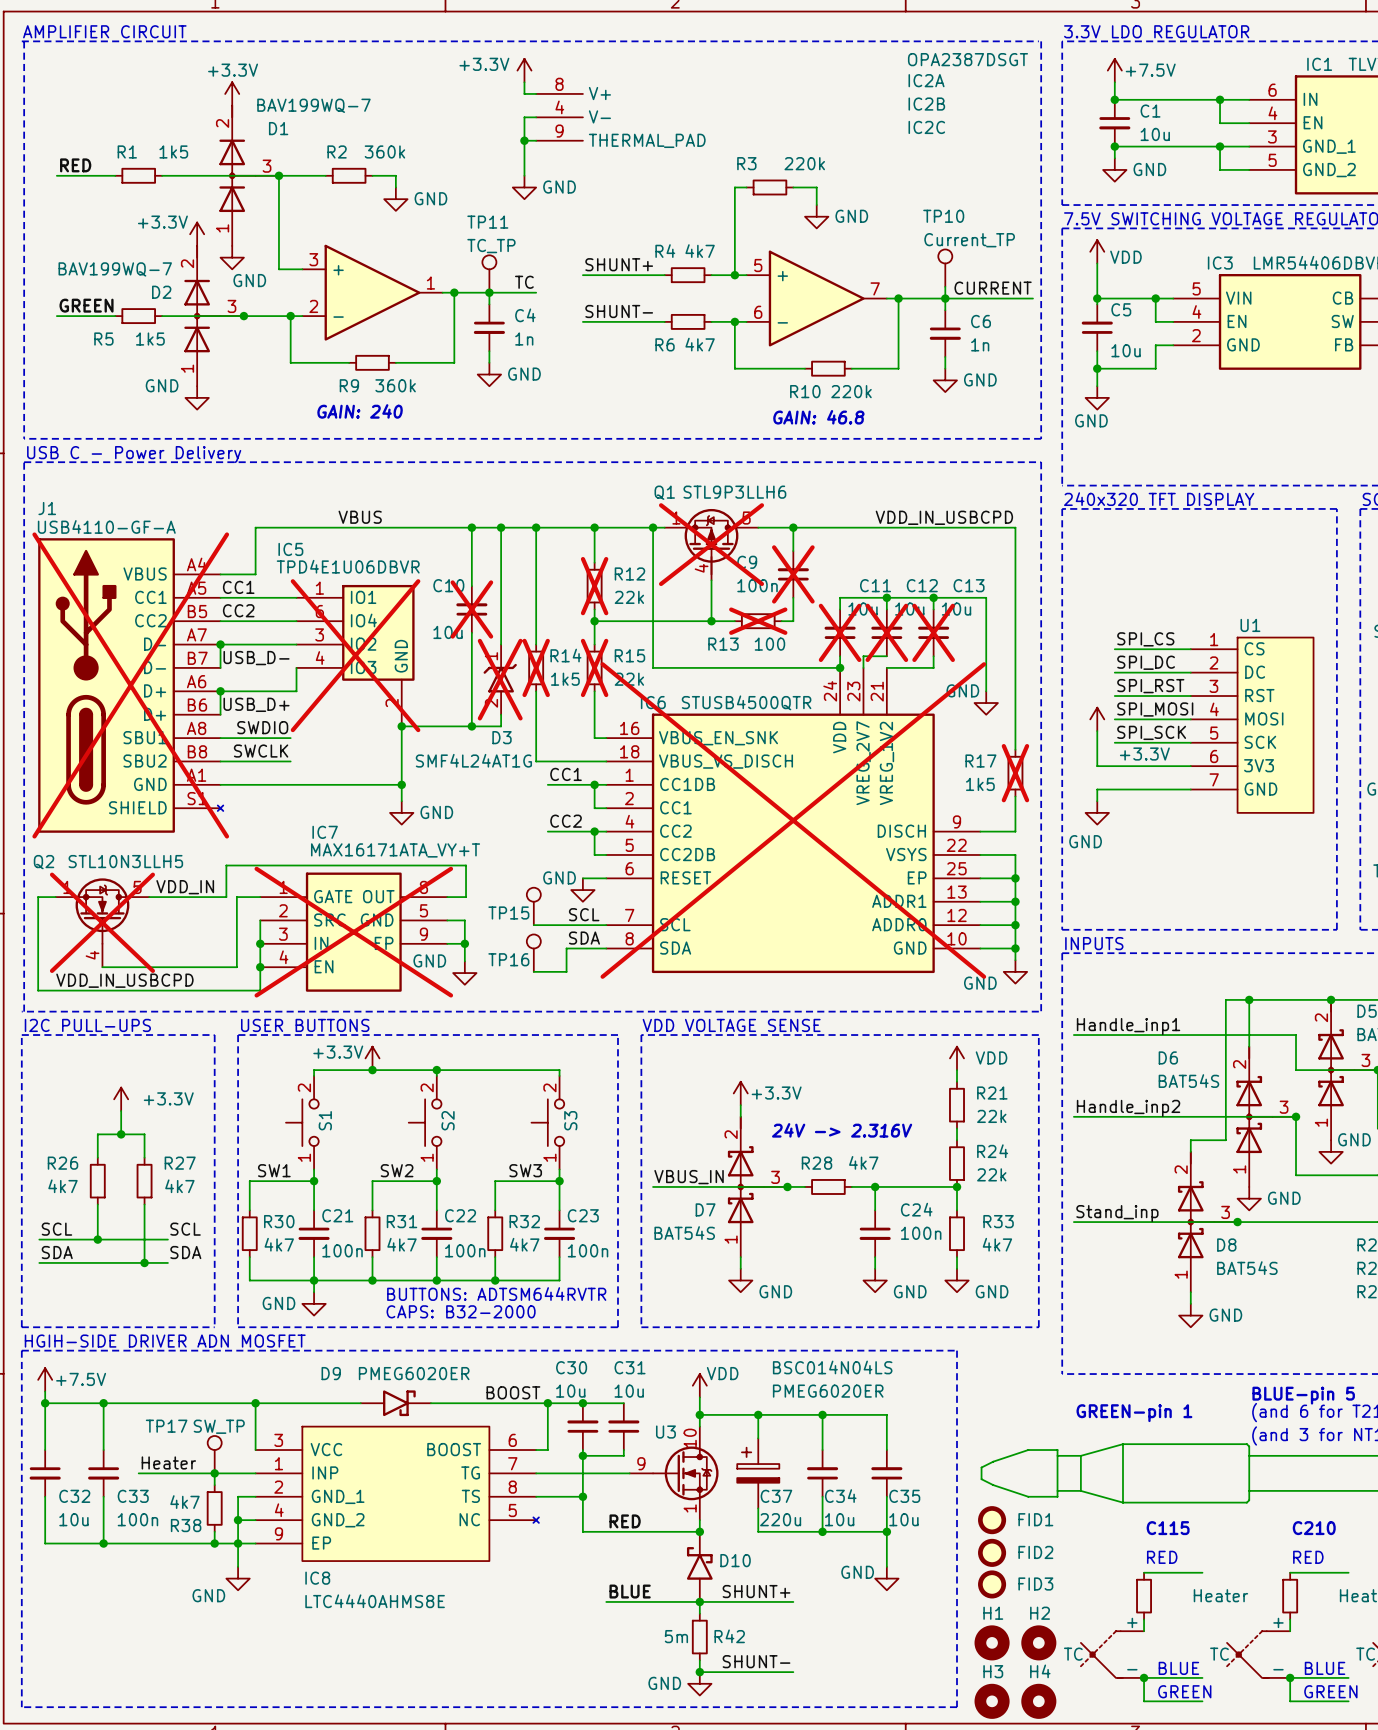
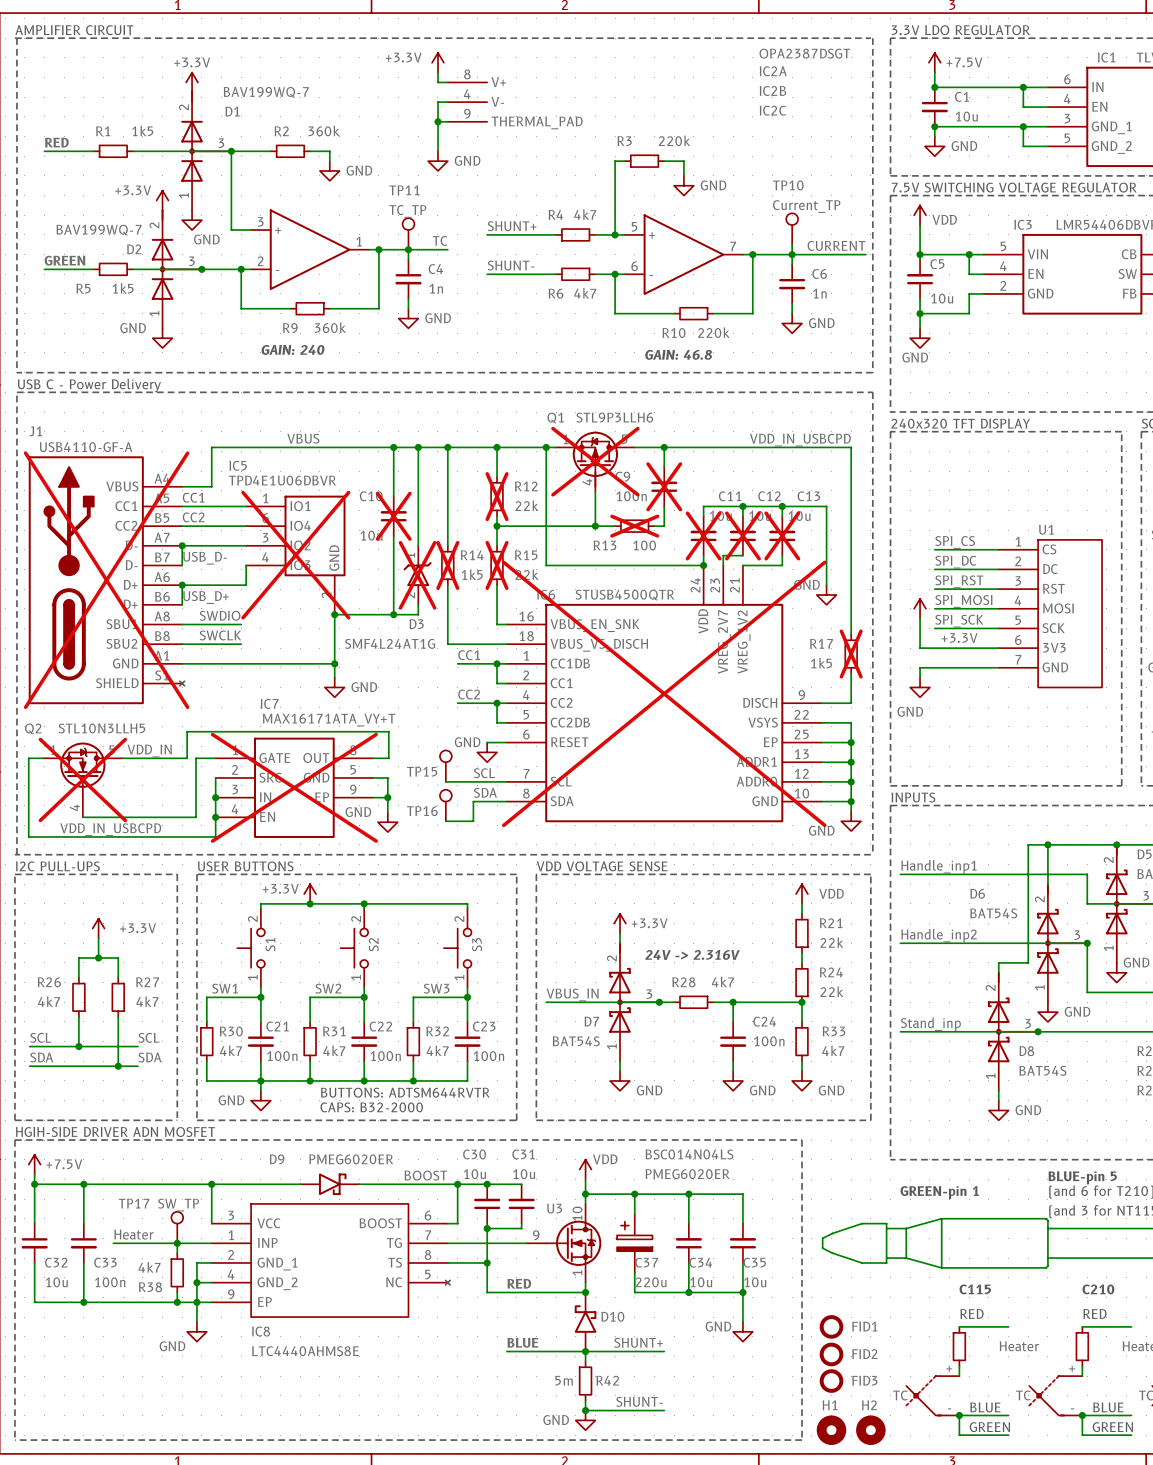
FID1 position: (992, 1520) -> (831, 1326)
FID2 position: (992, 1552) -> (831, 1354)
FID3 position: (992, 1584) -> (831, 1381)
H1 position: (992, 1642) -> (831, 1430)
H2 position: (1038, 1642) -> (870, 1430)
H3: (992, 1701) -> none
H4: (1038, 1701) -> none

